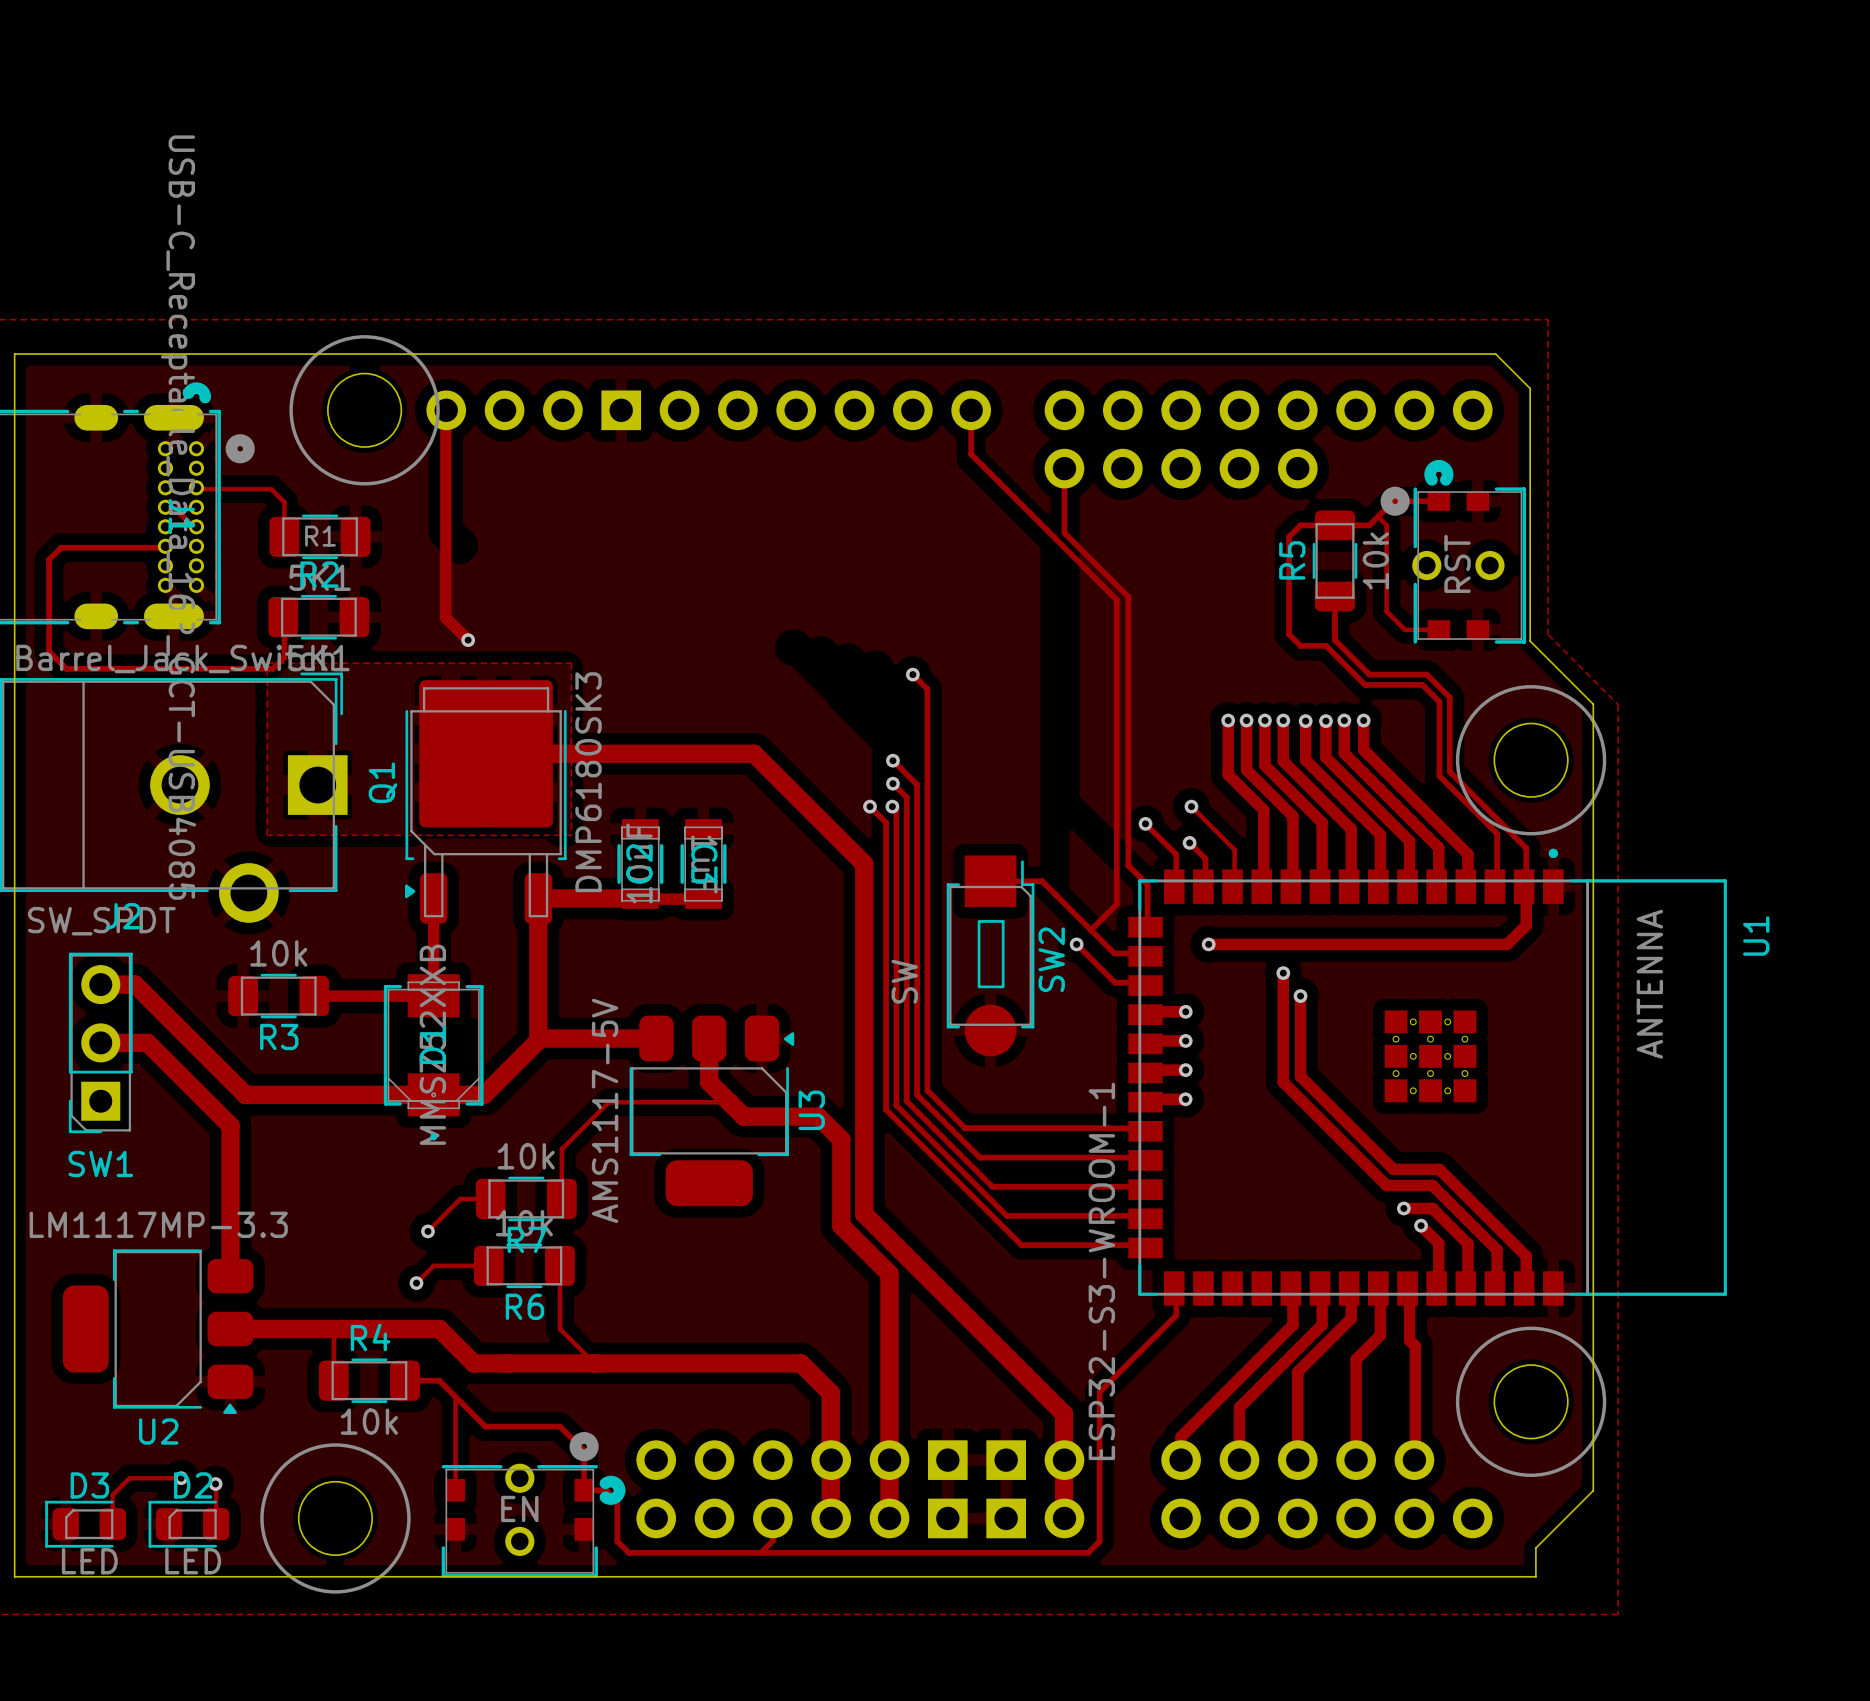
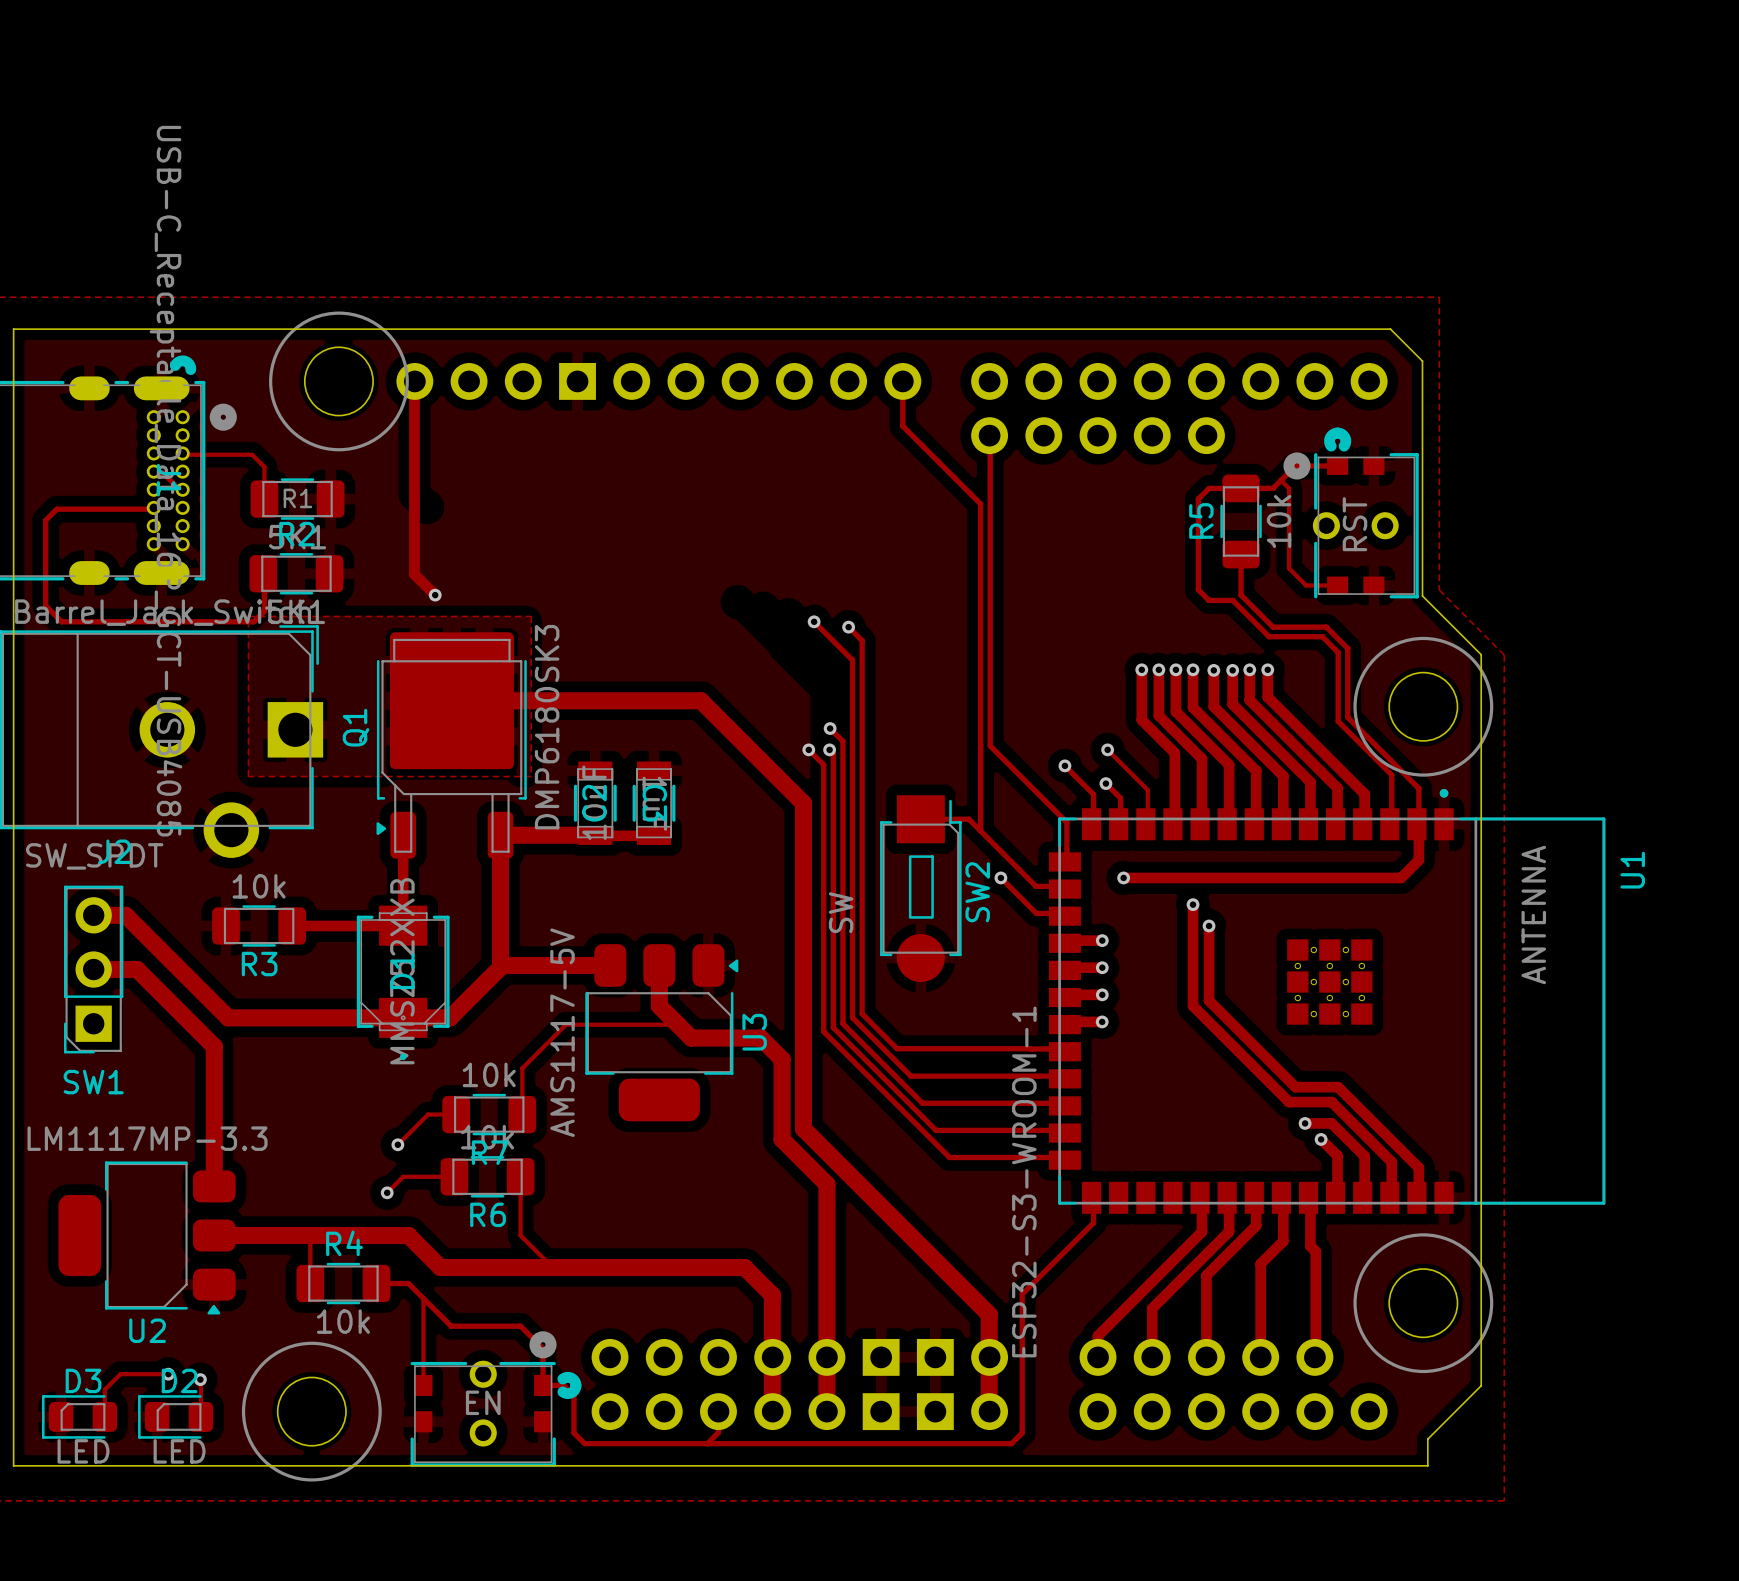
track: (971, 454) (1116, 599) (1116, 904) (1091, 930) -> (902, 422) (902, 426) (980, 504) (980, 830)
track: (1064, 468) (1064, 533) (1128, 596) (1128, 865) -> (989, 435) (990, 745) (1048, 804)
track: (892, 760) (917, 784) -> (814, 621) (852, 660) (852, 729)
via position: (892, 760) -> (814, 621)

